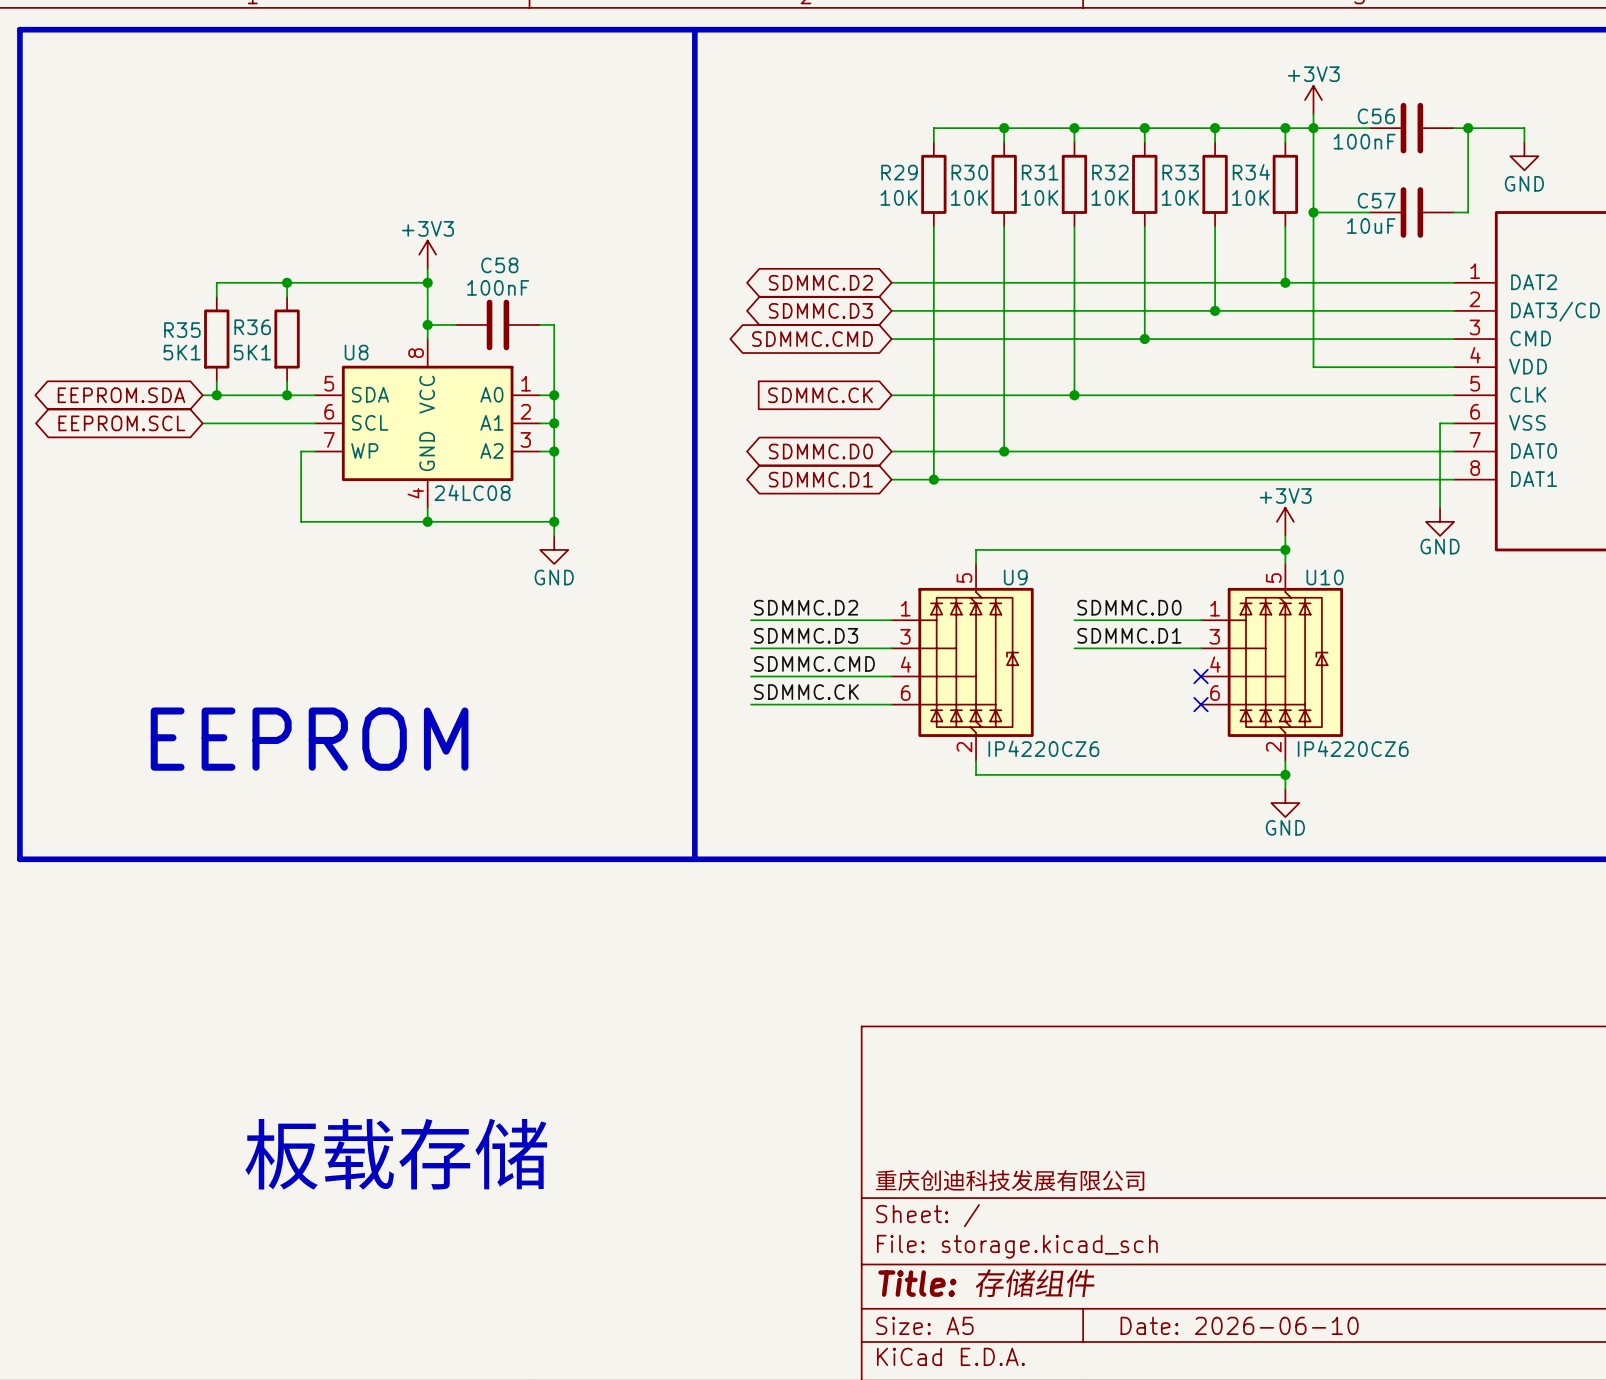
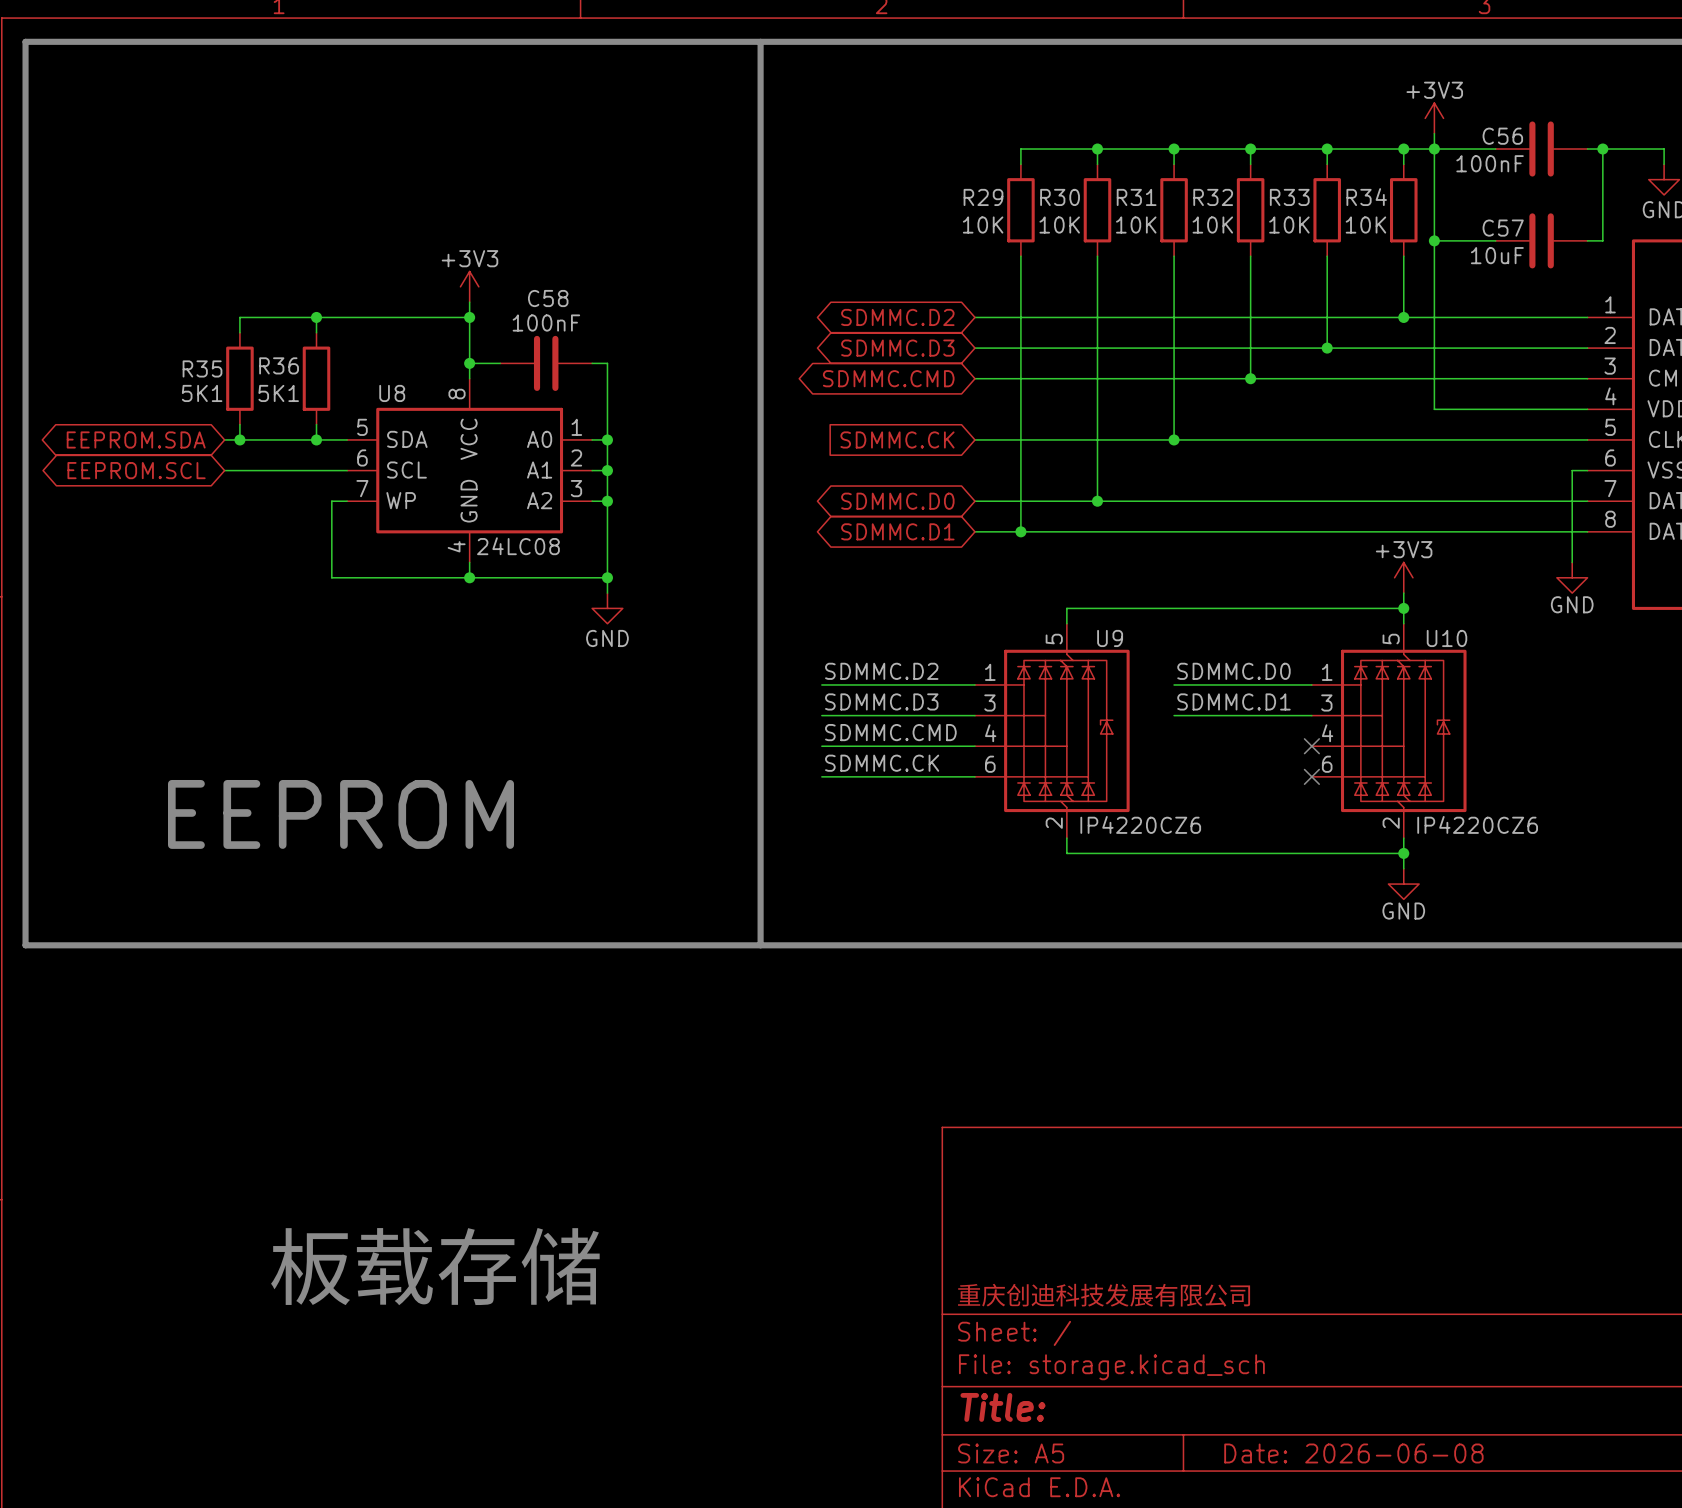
title block: Title: 存储组件 (987, 1283) -> Title: (1002, 1407)
title block: Date: 2026-06-10 (1239, 1325) -> Date: 2026-06-08 (1353, 1453)

